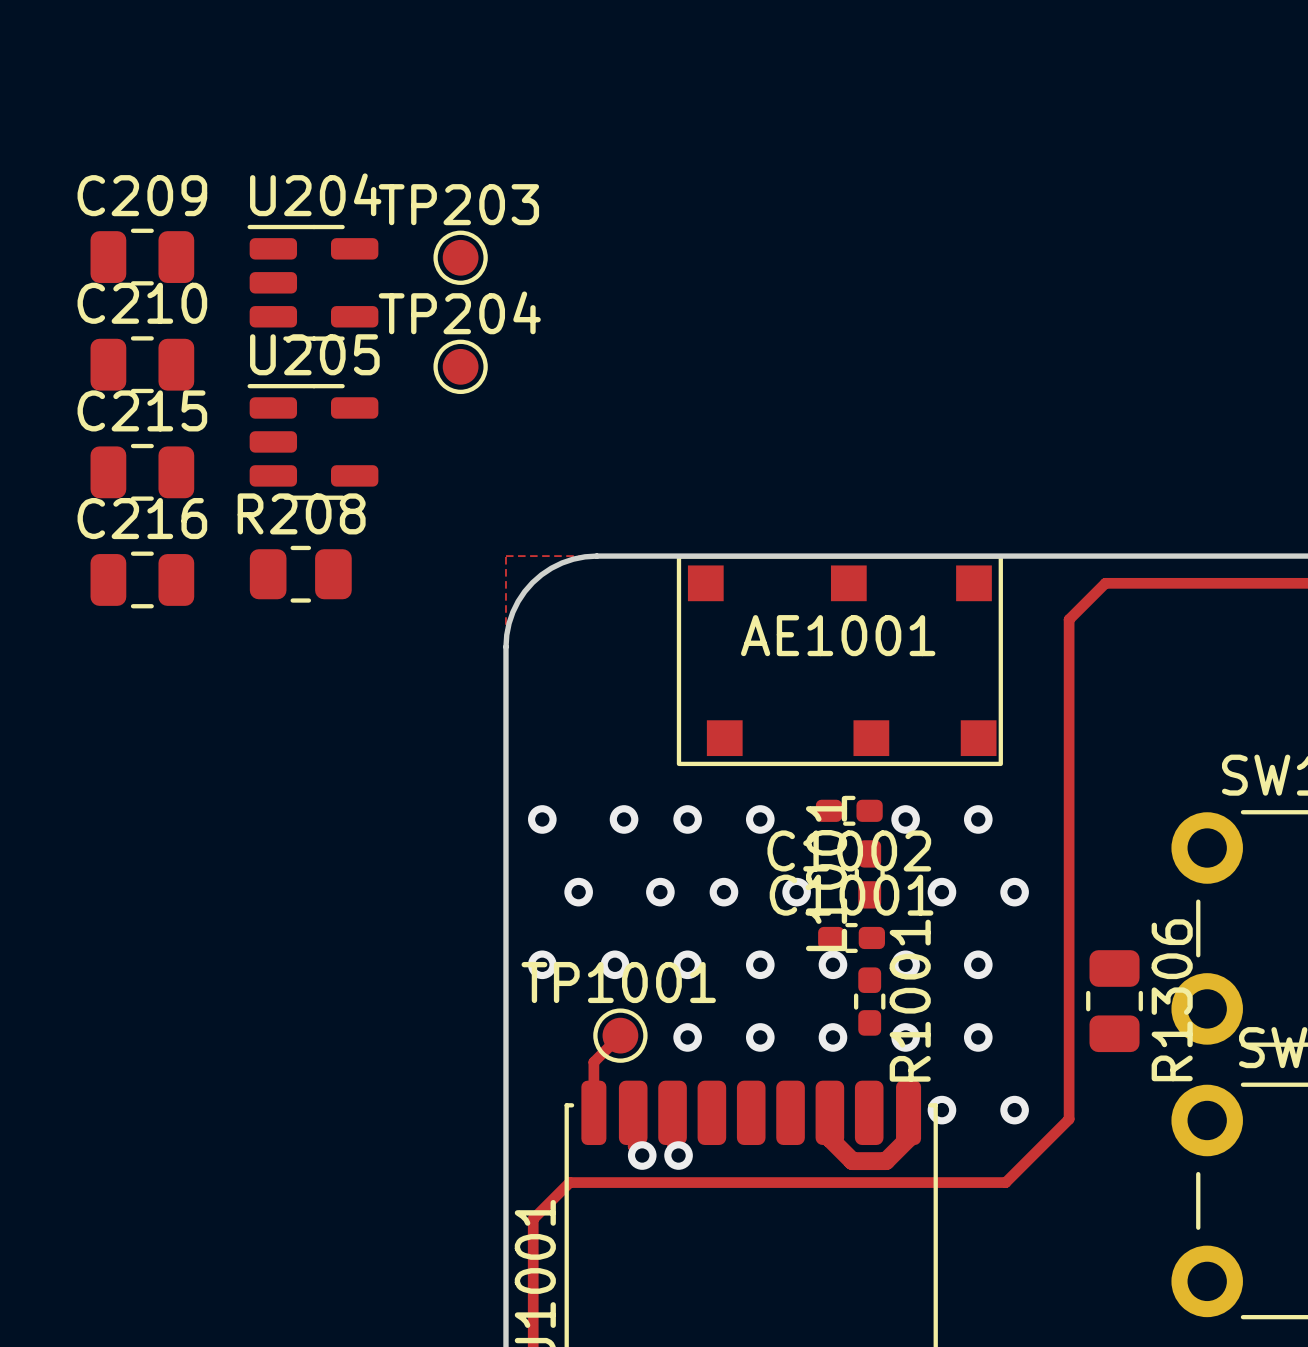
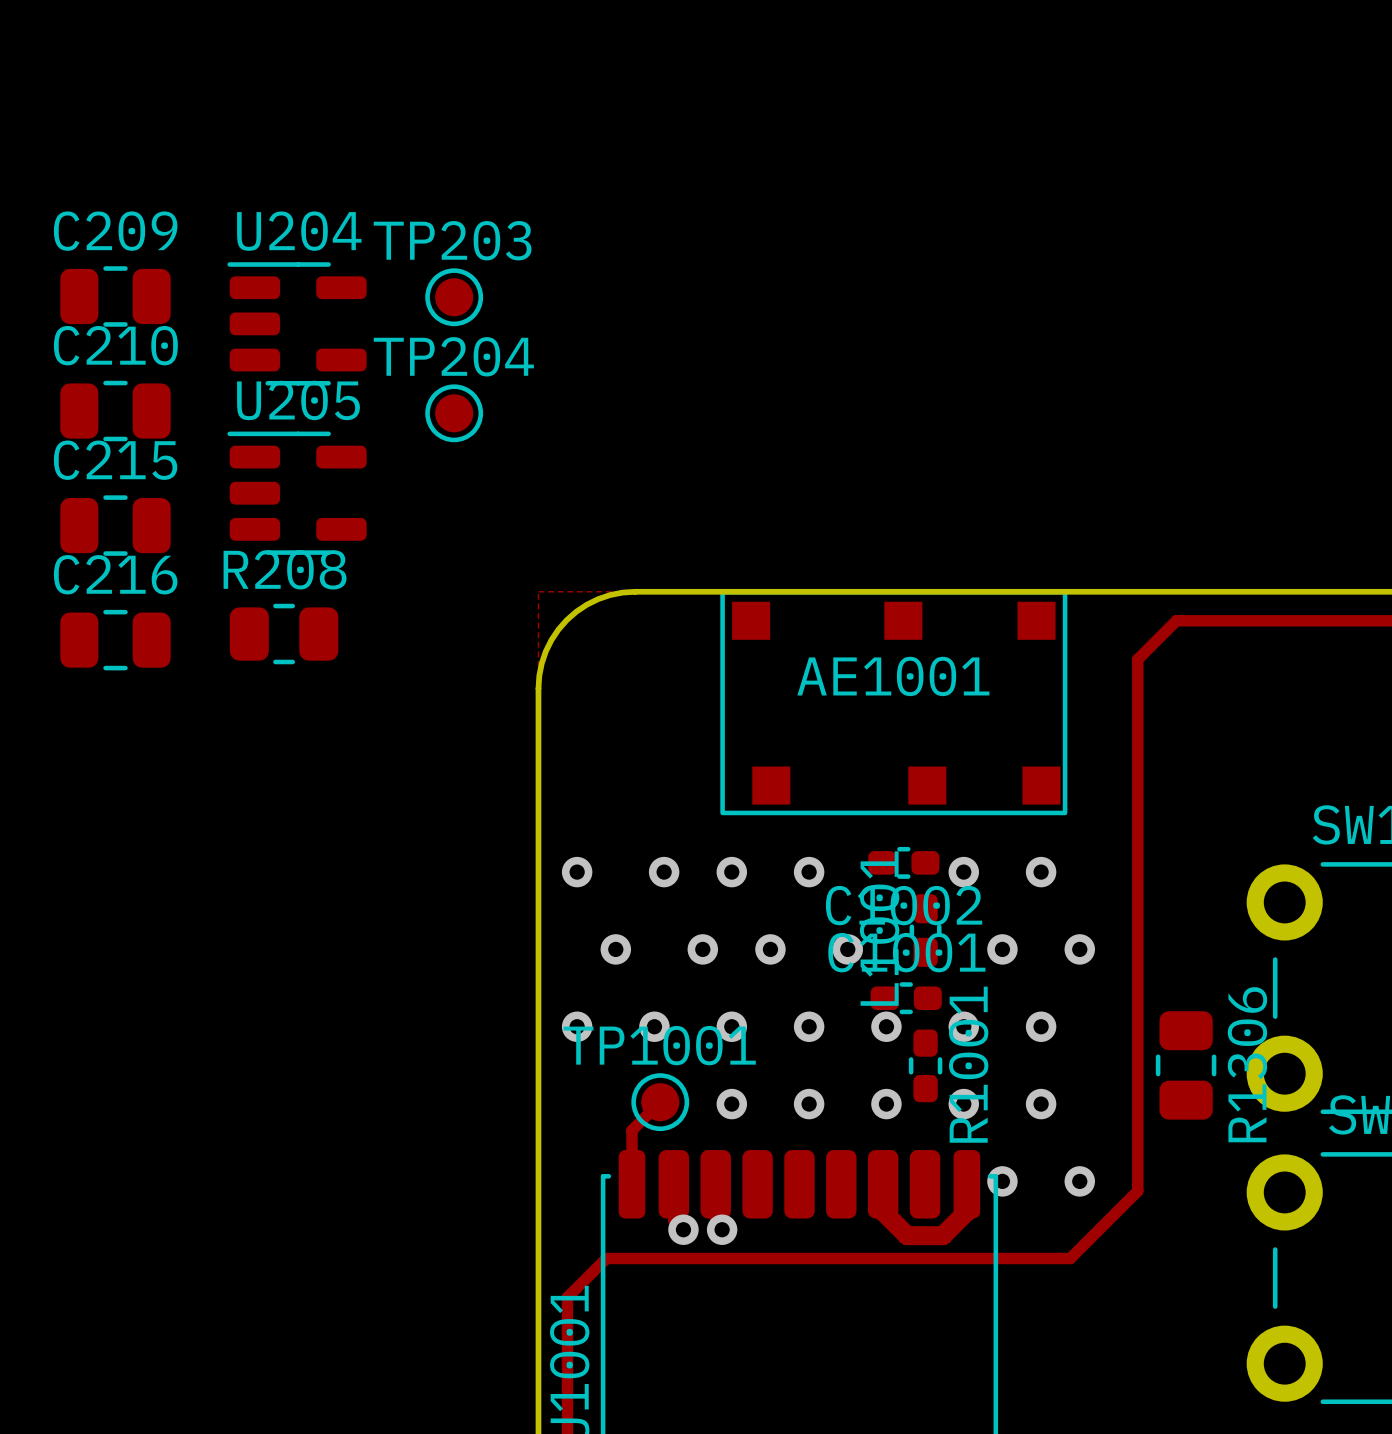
C209 position: (142, 257) -> (115, 296)
TP203 position: (460, 257) -> (454, 297)
U204 position: (312, 282) -> (297, 323)
C210 position: (142, 364) -> (115, 411)
TP204 position: (460, 366) -> (454, 413)
U205 position: (312, 441) -> (297, 493)
C215 position: (142, 472) -> (115, 525)
R208 position: (300, 574) -> (284, 634)
C216 position: (142, 579) -> (115, 640)

